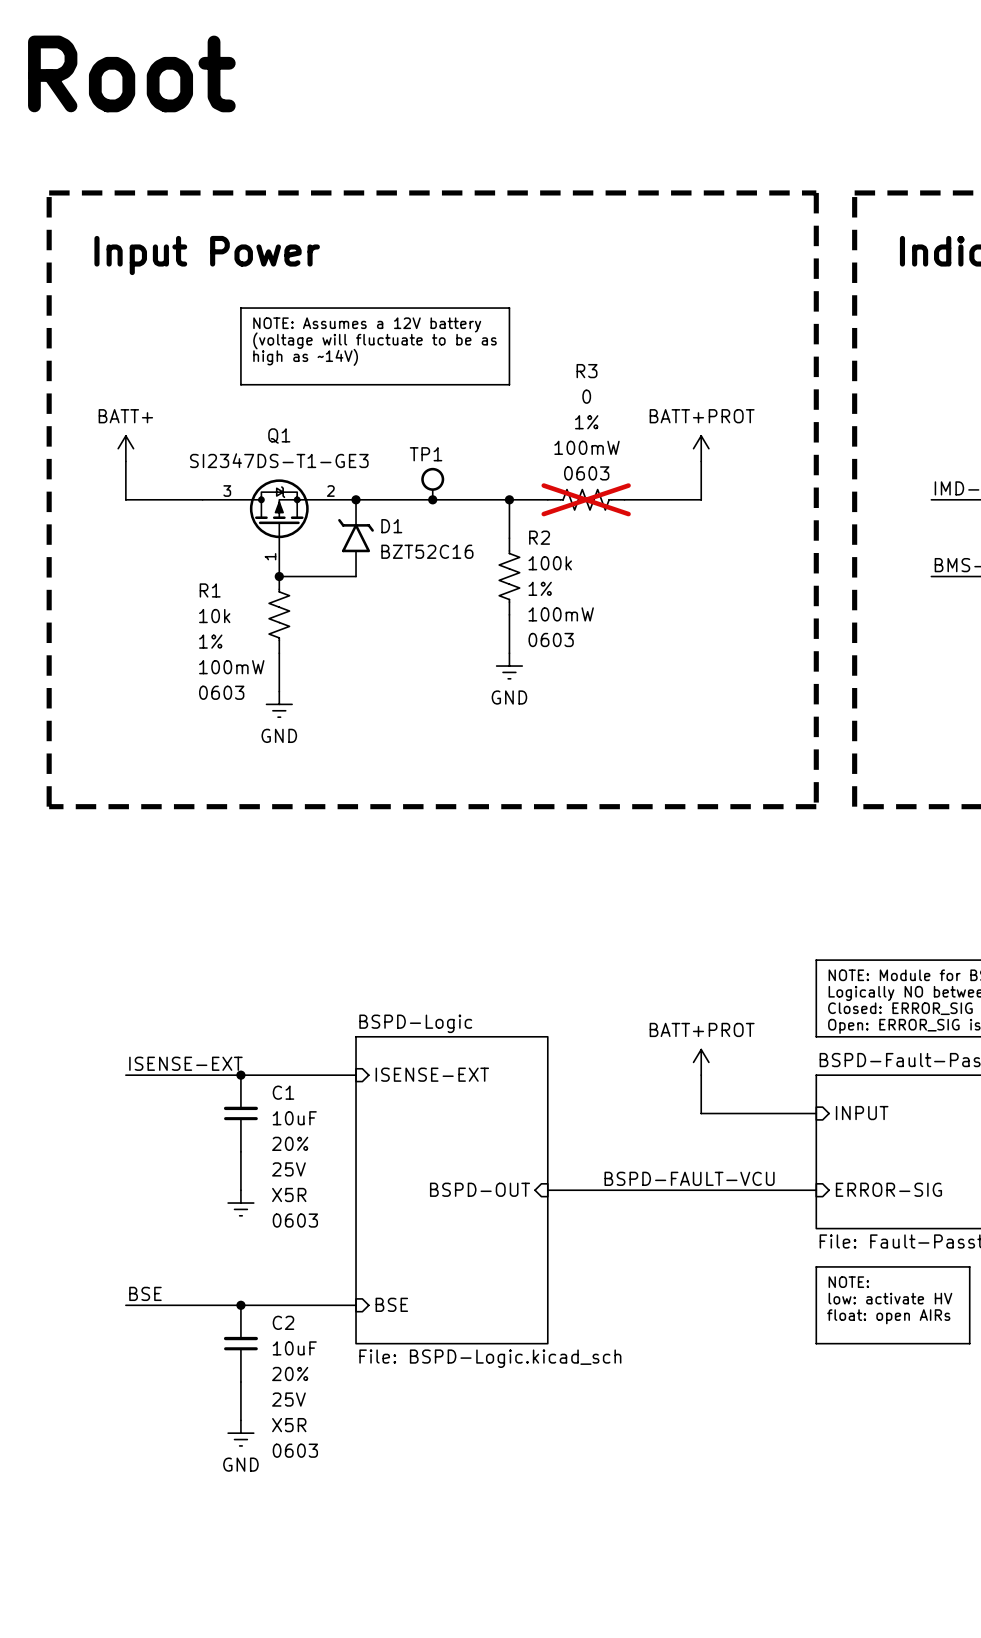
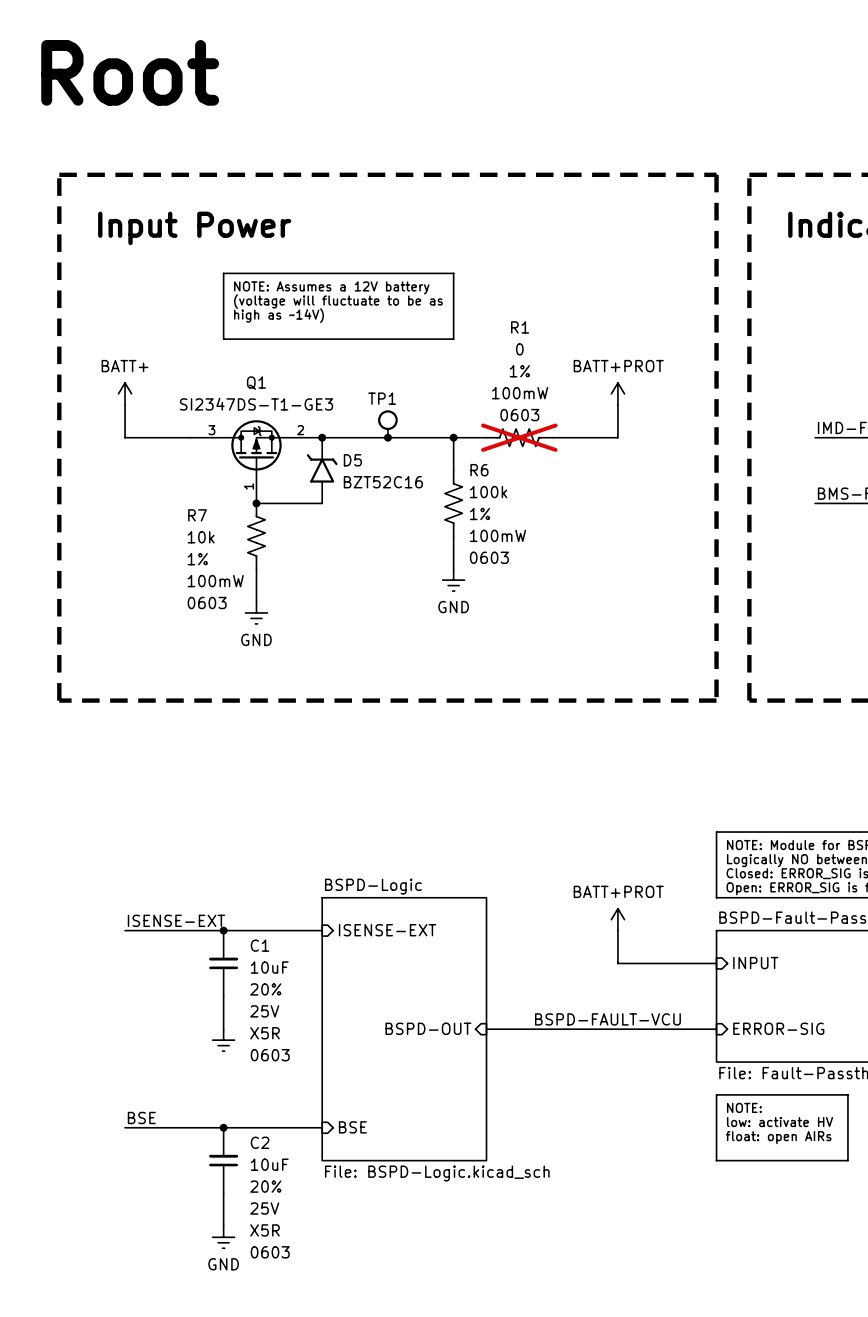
R3 name: R3 (587, 371) -> R1 (520, 327)
D1 name: D1 (391, 526) -> D5 (352, 460)
R2 name: R2 (539, 537) -> R6 (479, 470)
R1 name: R1 (210, 590) -> R7 (197, 515)

